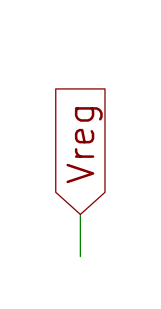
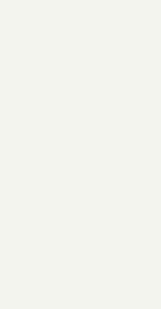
global label: Vreg (84, 145) -> none
wire: (80, 214) (80, 256) -> none

